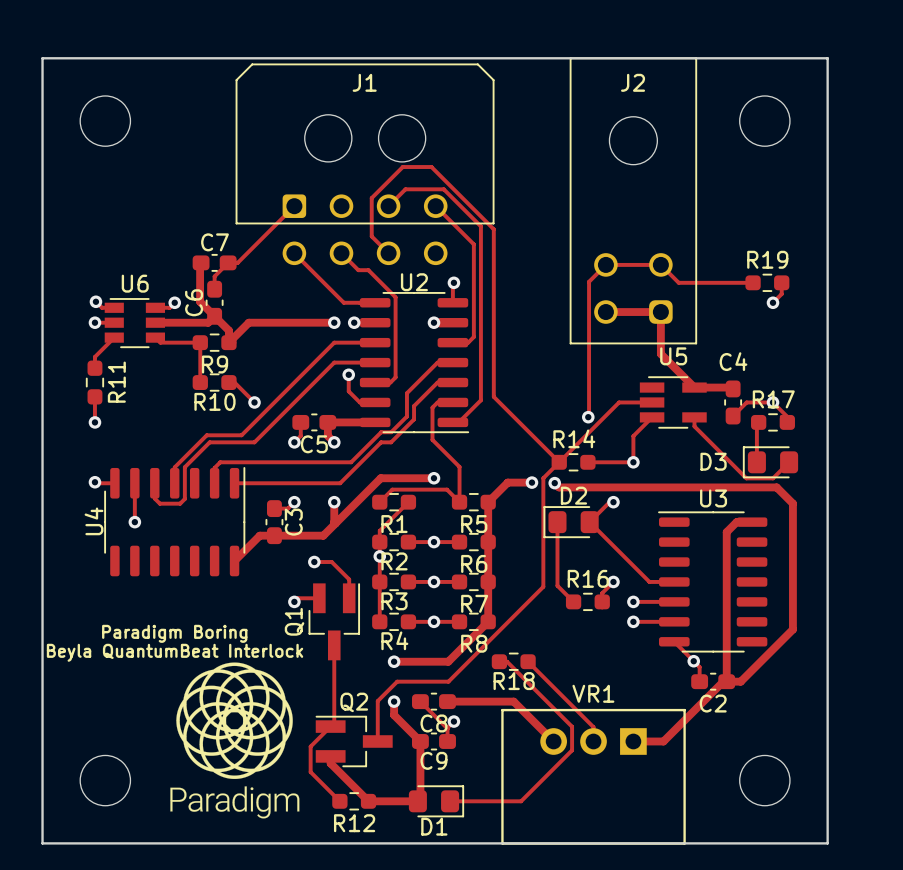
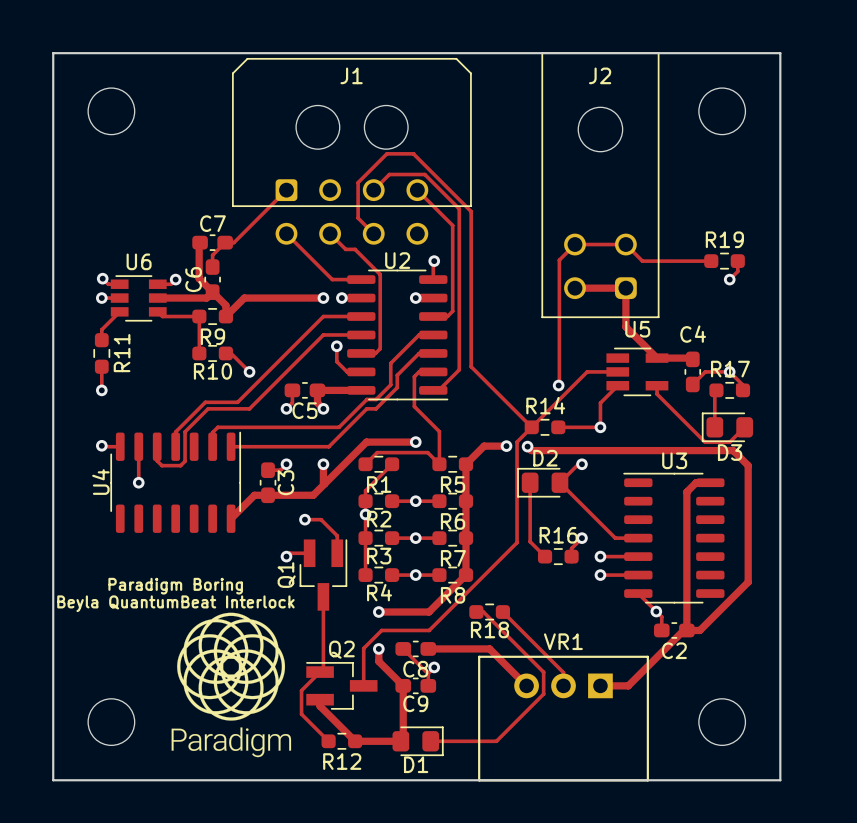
D3 name position: D3 (713, 461) -> D3 (730, 452)

